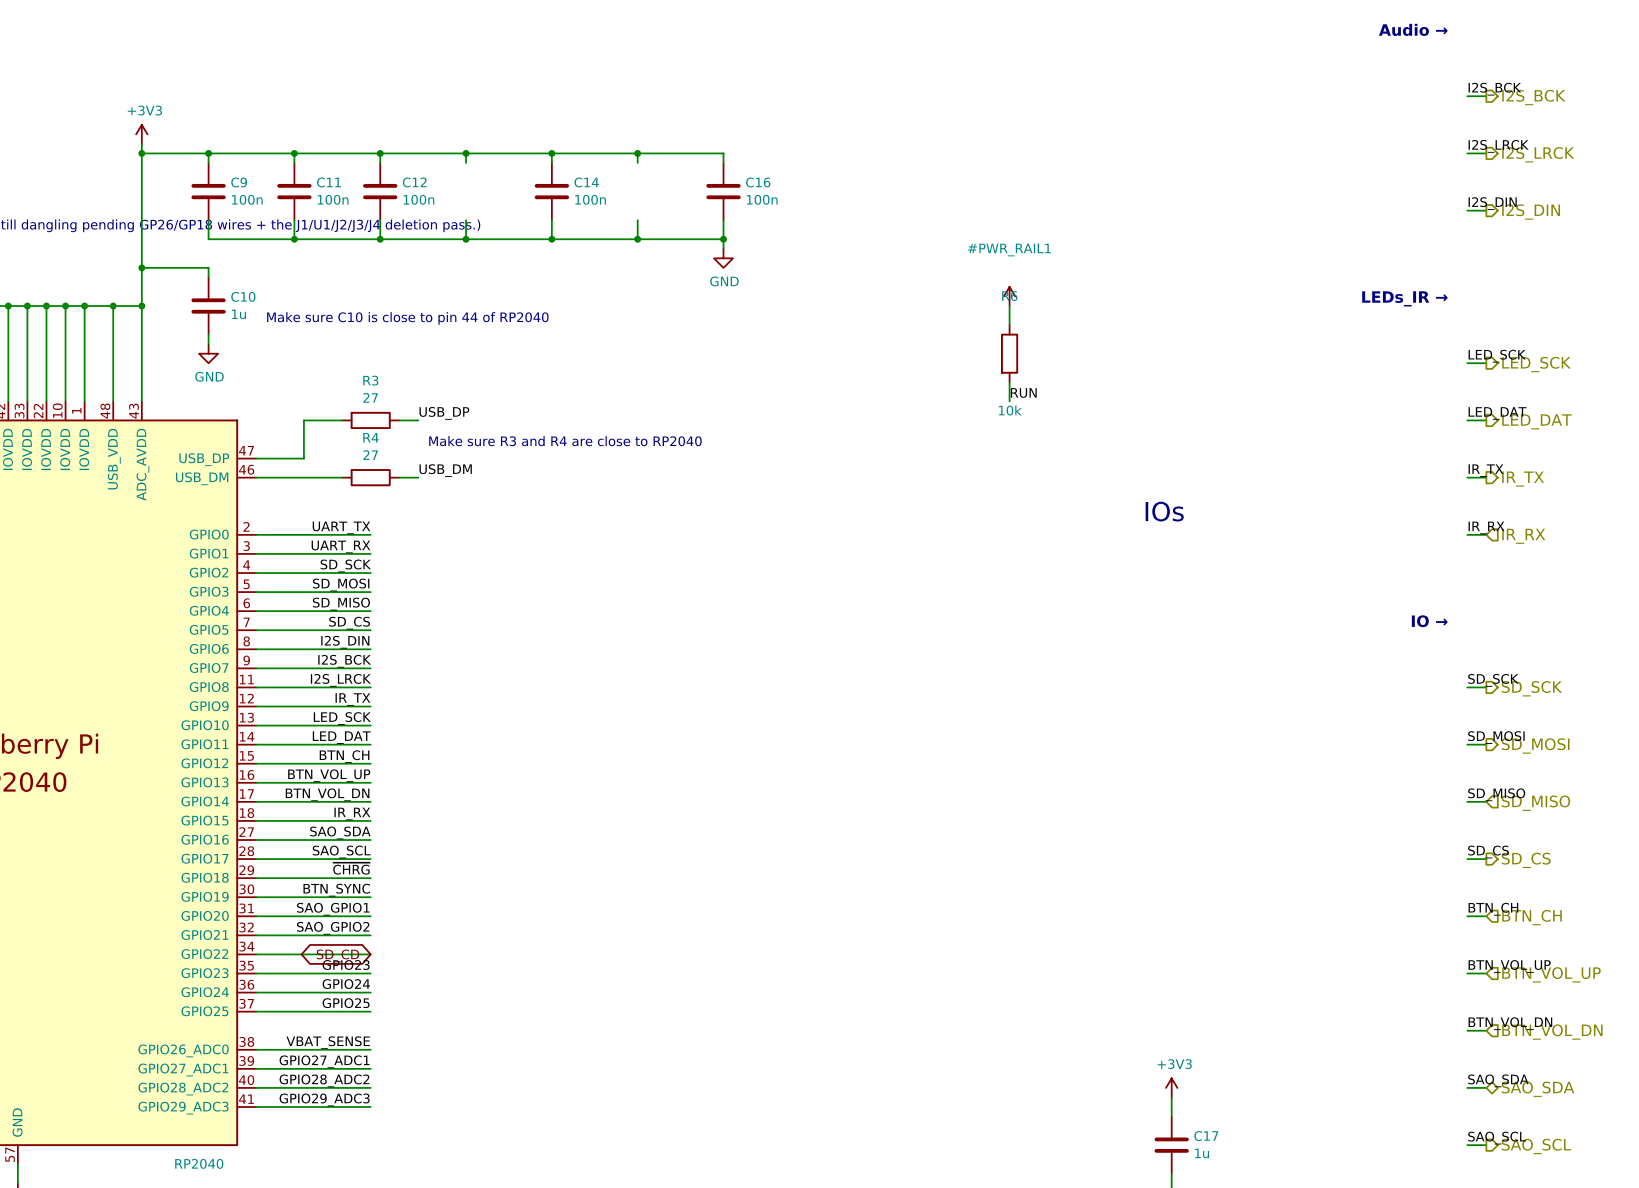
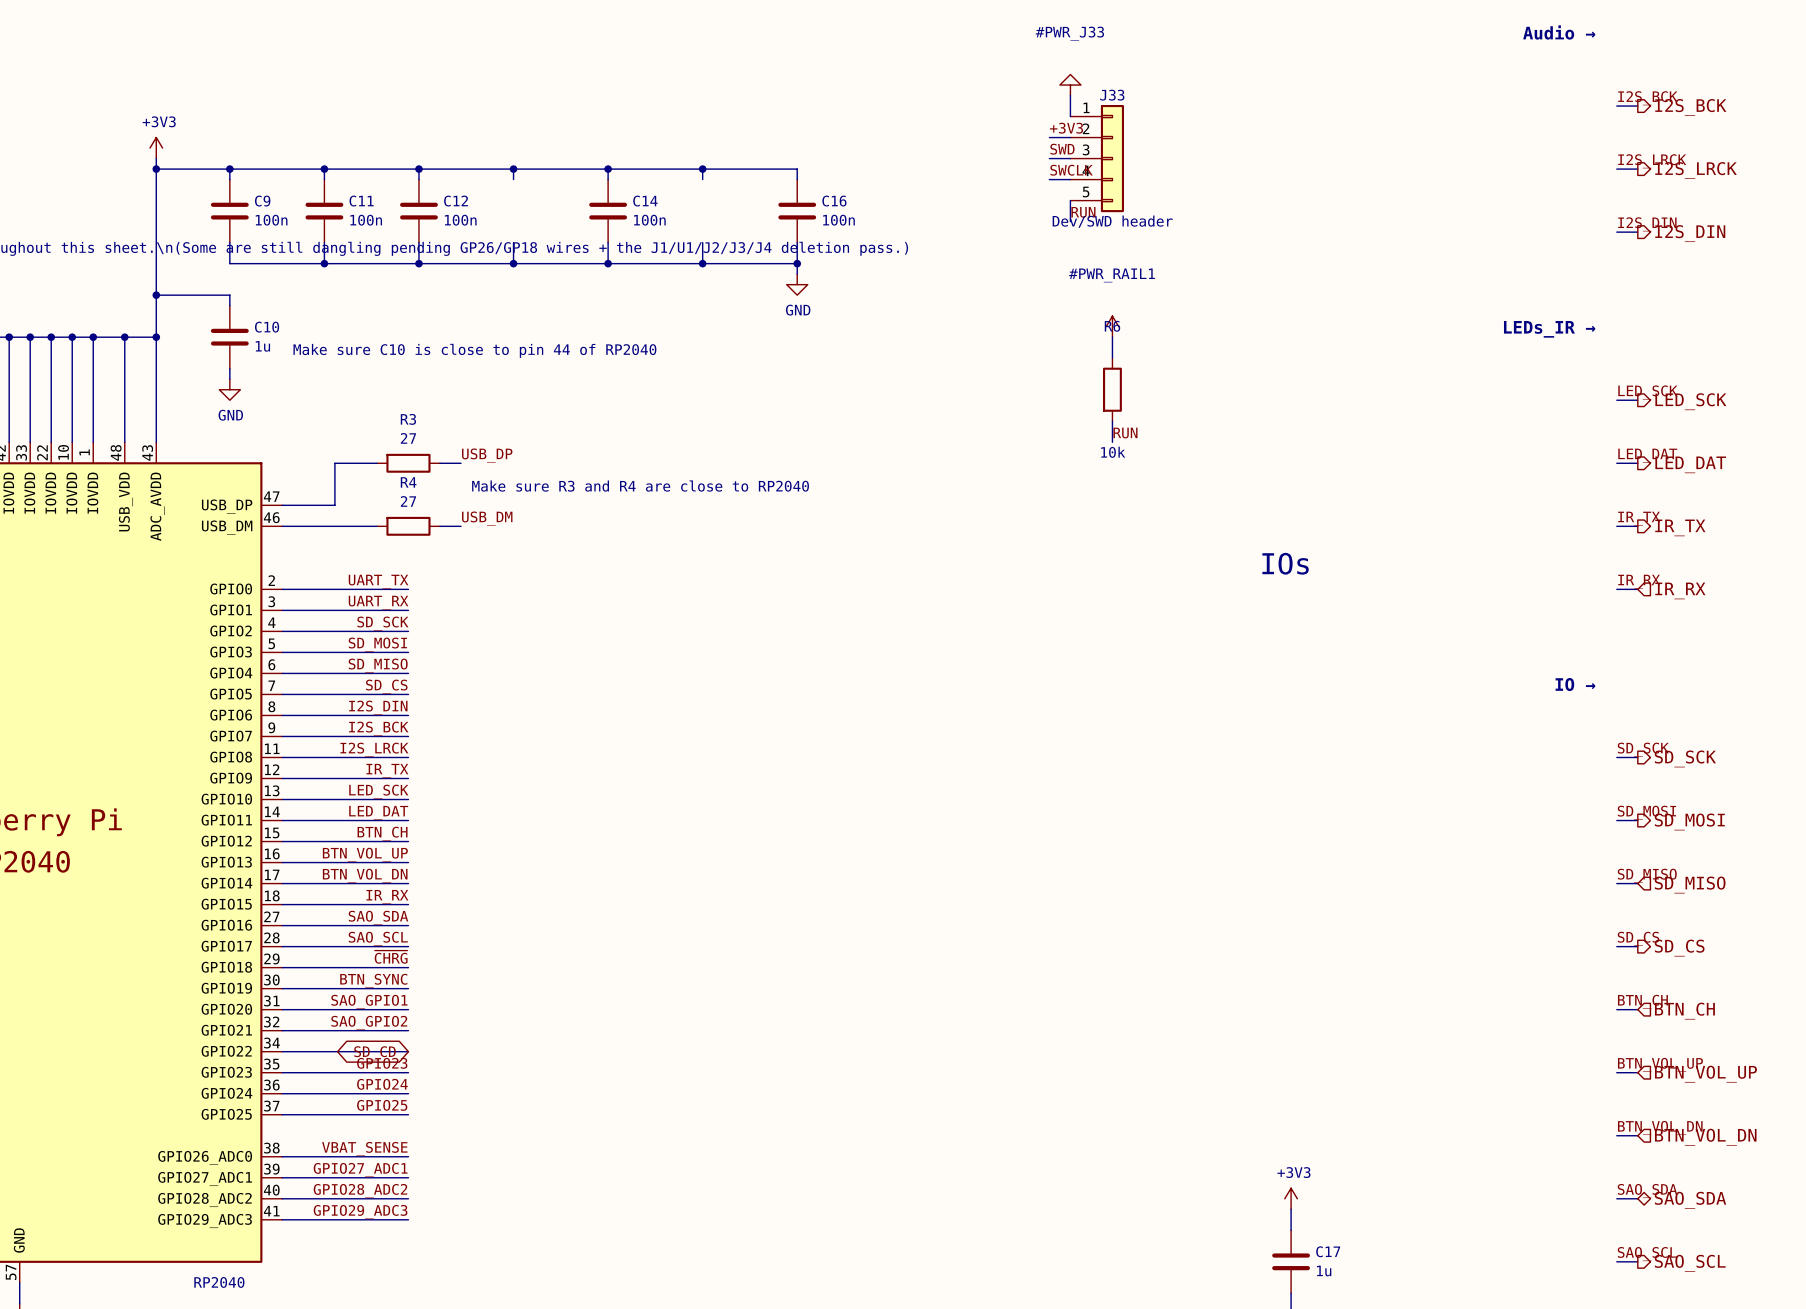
#PWR_J33: none -> (1070, 85)
wire: none -> (1070, 95) (1070, 116)
label: none -> +3V3 (1066, 128)
wire: none -> (1049, 137) (1070, 137)
label: none -> SWD (1062, 149)
wire: none -> (1049, 158) (1070, 158)
J33: none -> Dev/SWD header (1097, 158)
label: none -> SWCLK (1071, 170)
wire: none -> (1049, 179) (1070, 179)
wire: none -> (1070, 200) (1070, 221)
label: none -> RUN (1083, 212)

